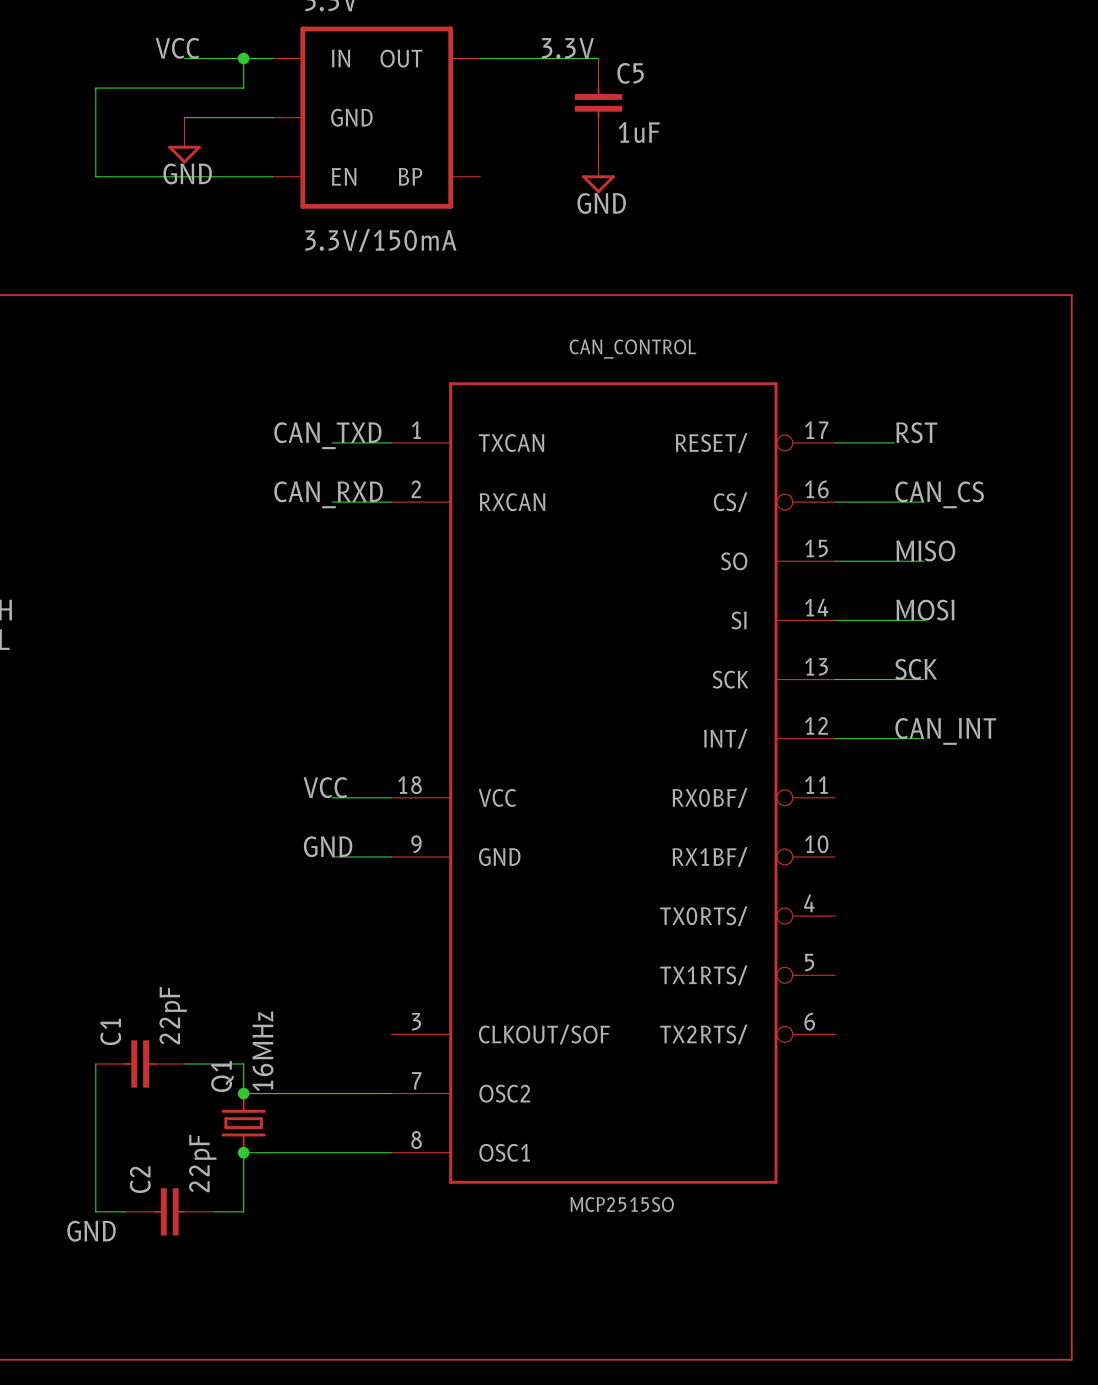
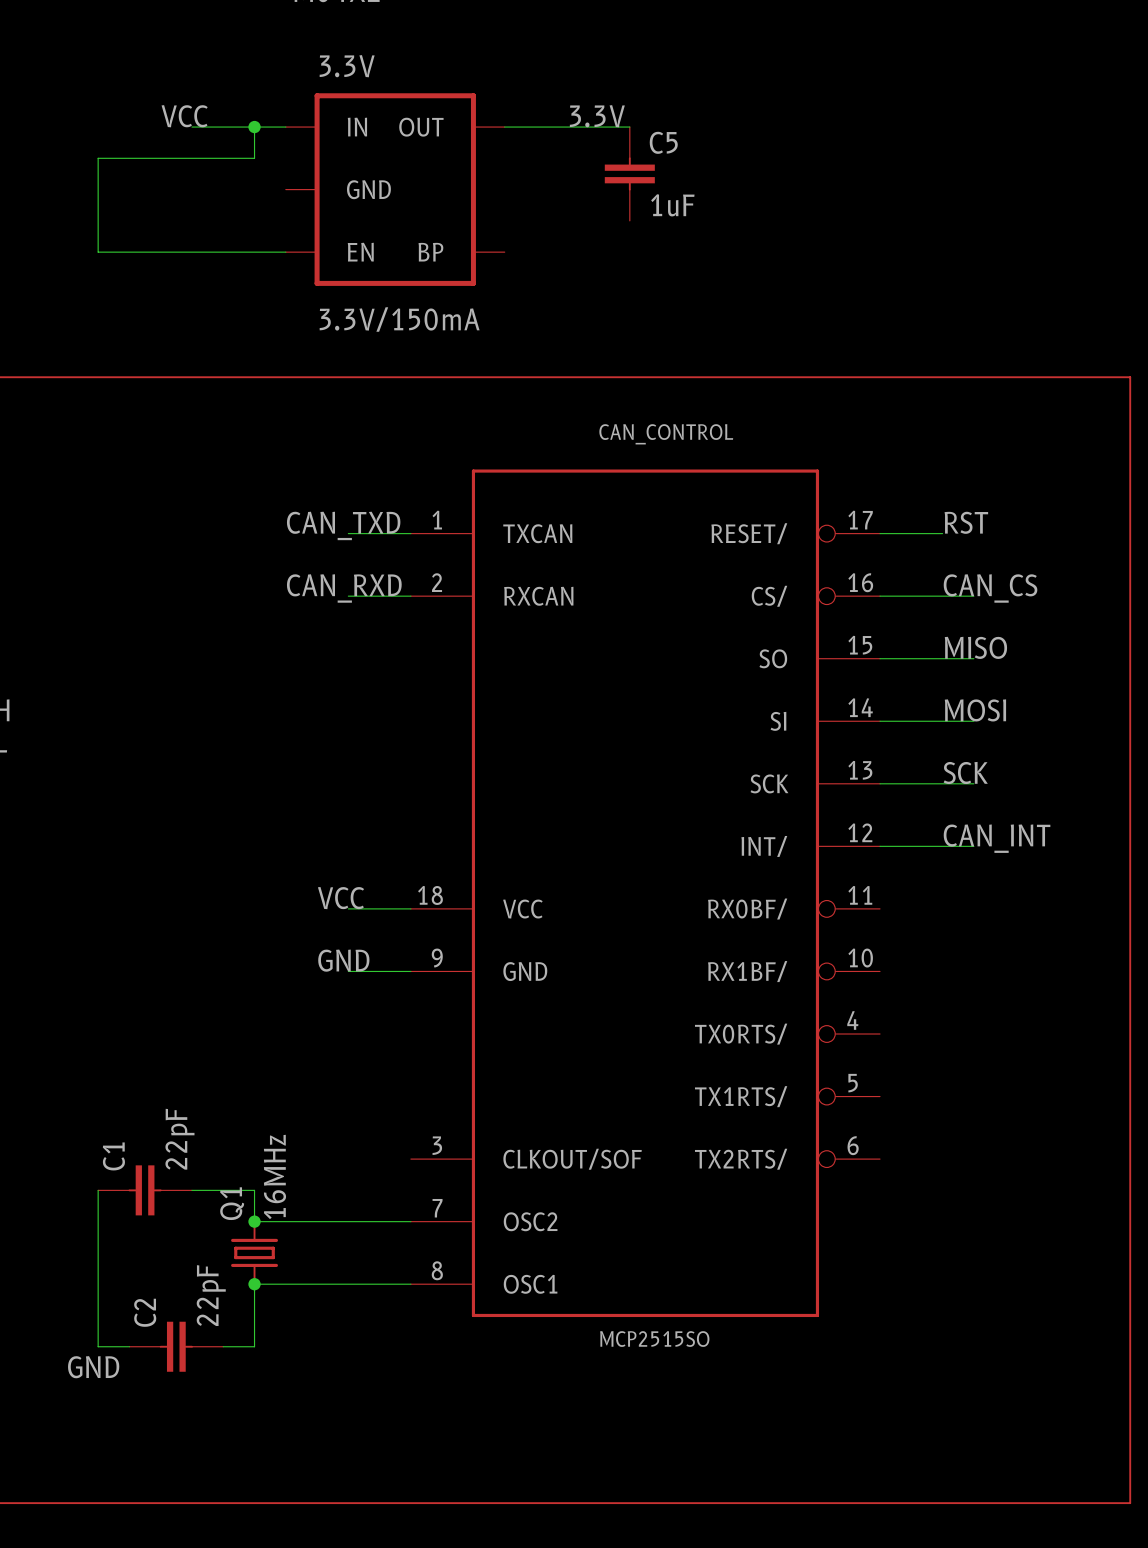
wire: (184, 117) (273, 117) -> none
power symbol: GND (184, 140) -> none
power symbol: GND (598, 170) -> none

